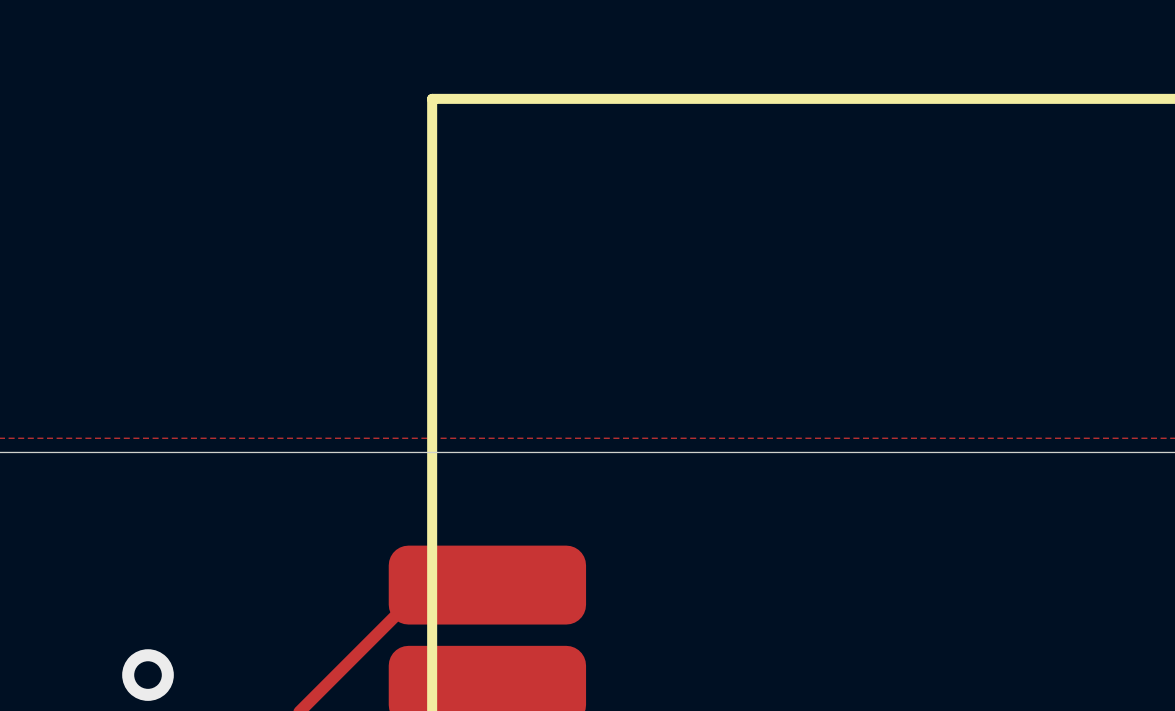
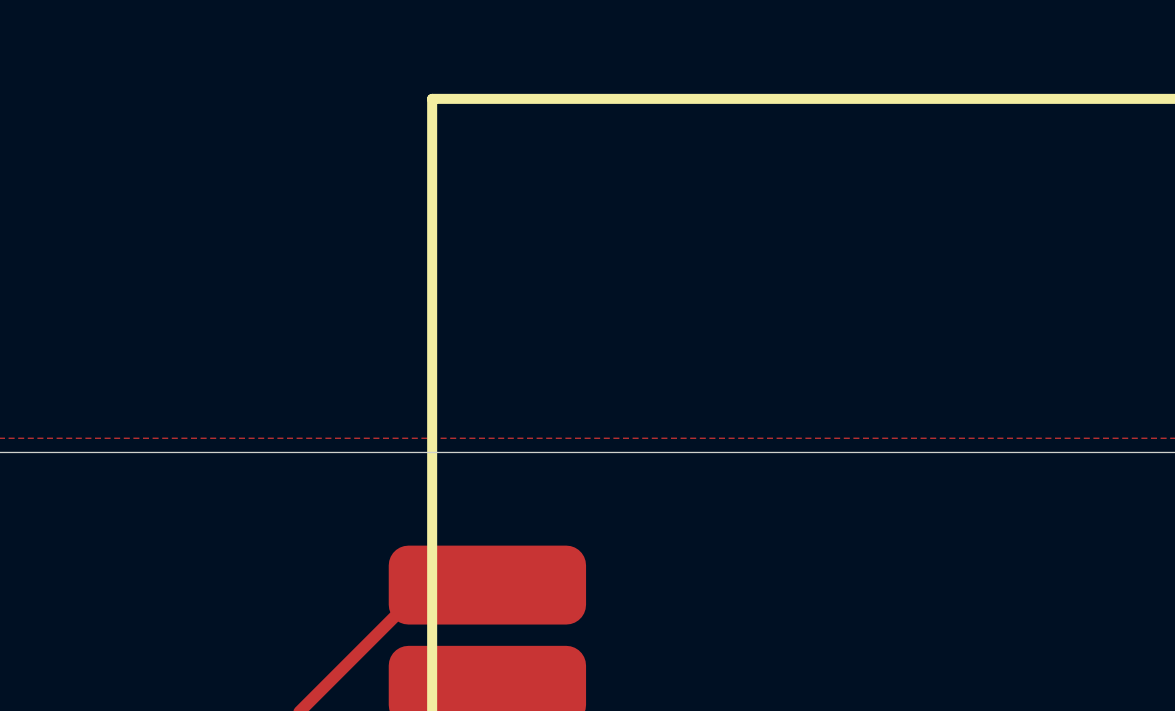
via: (148, 675) -> none

